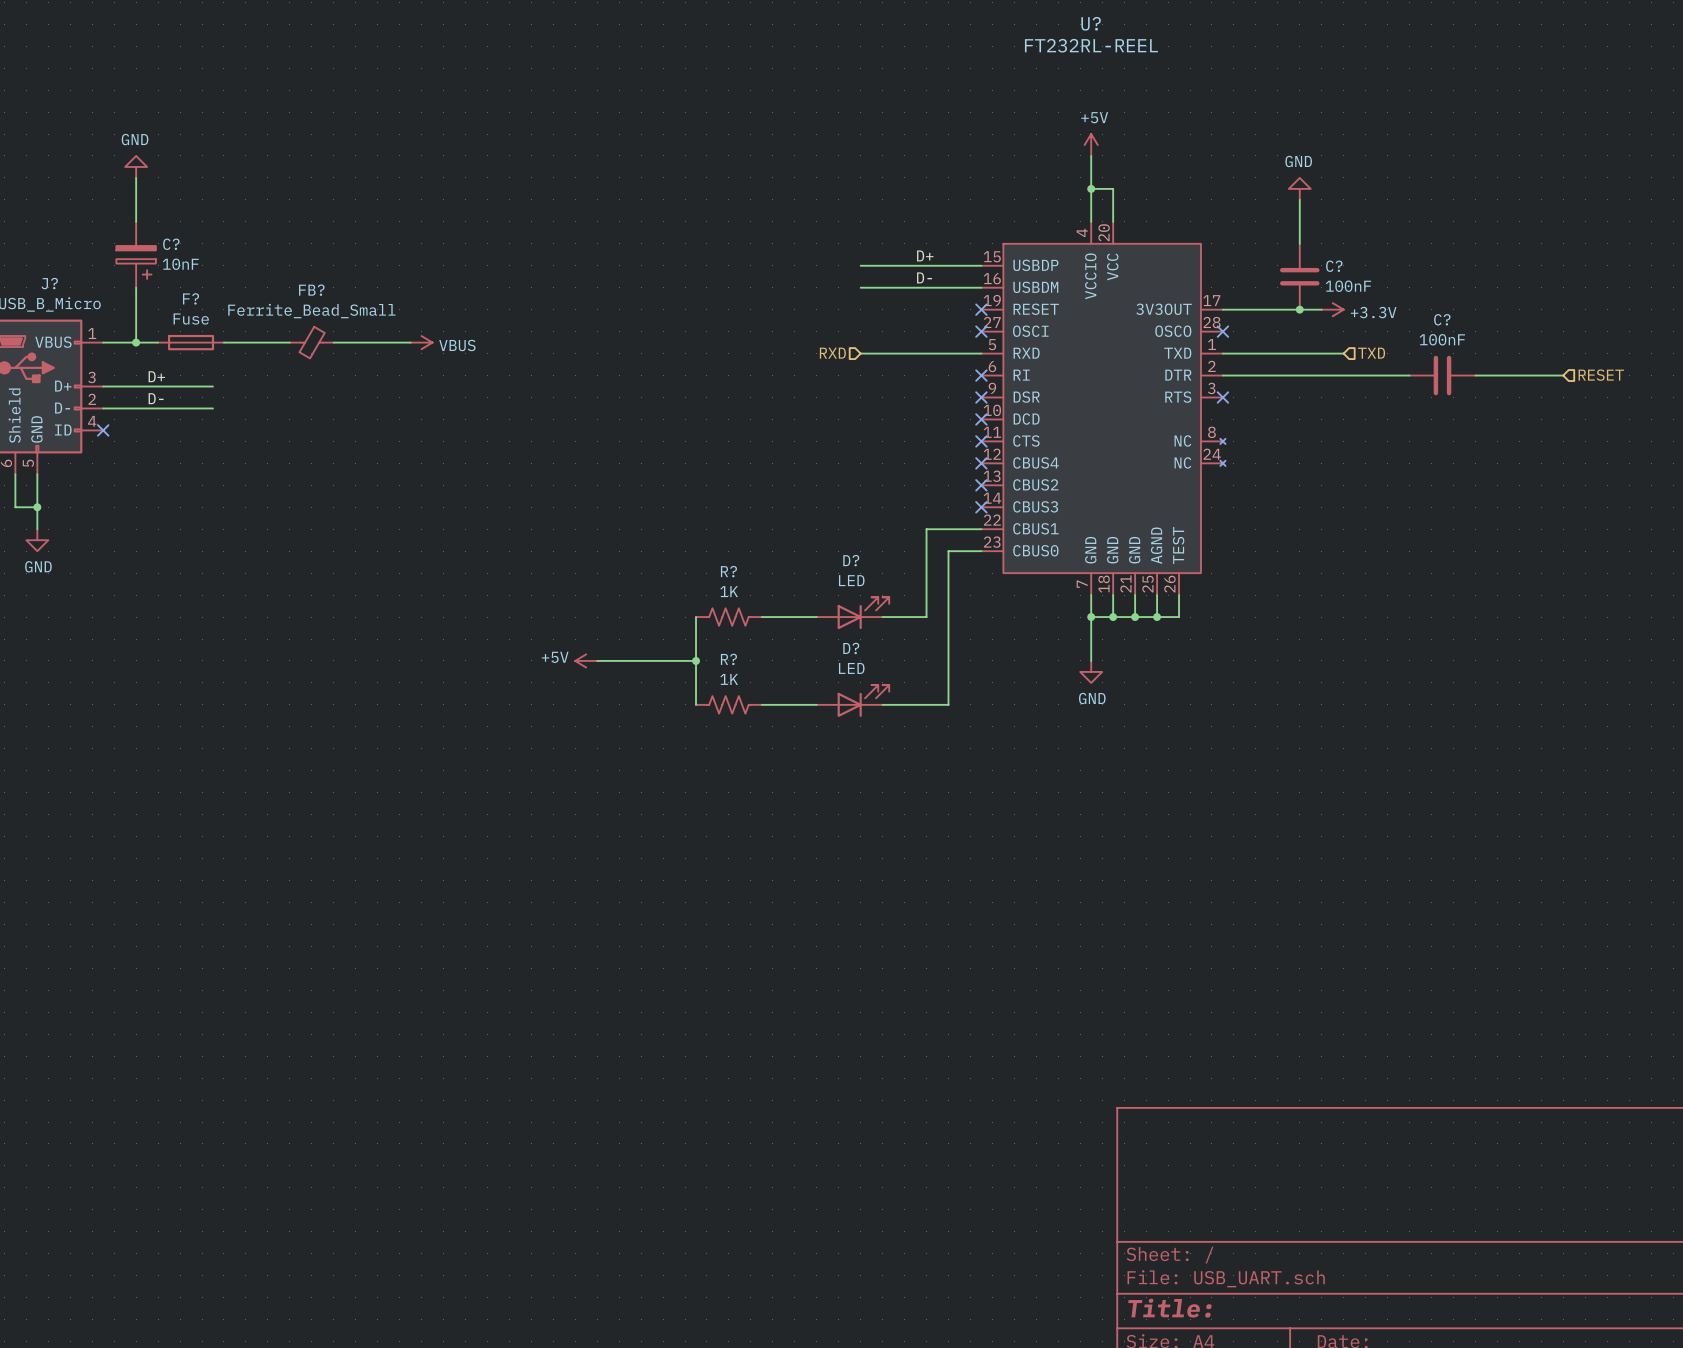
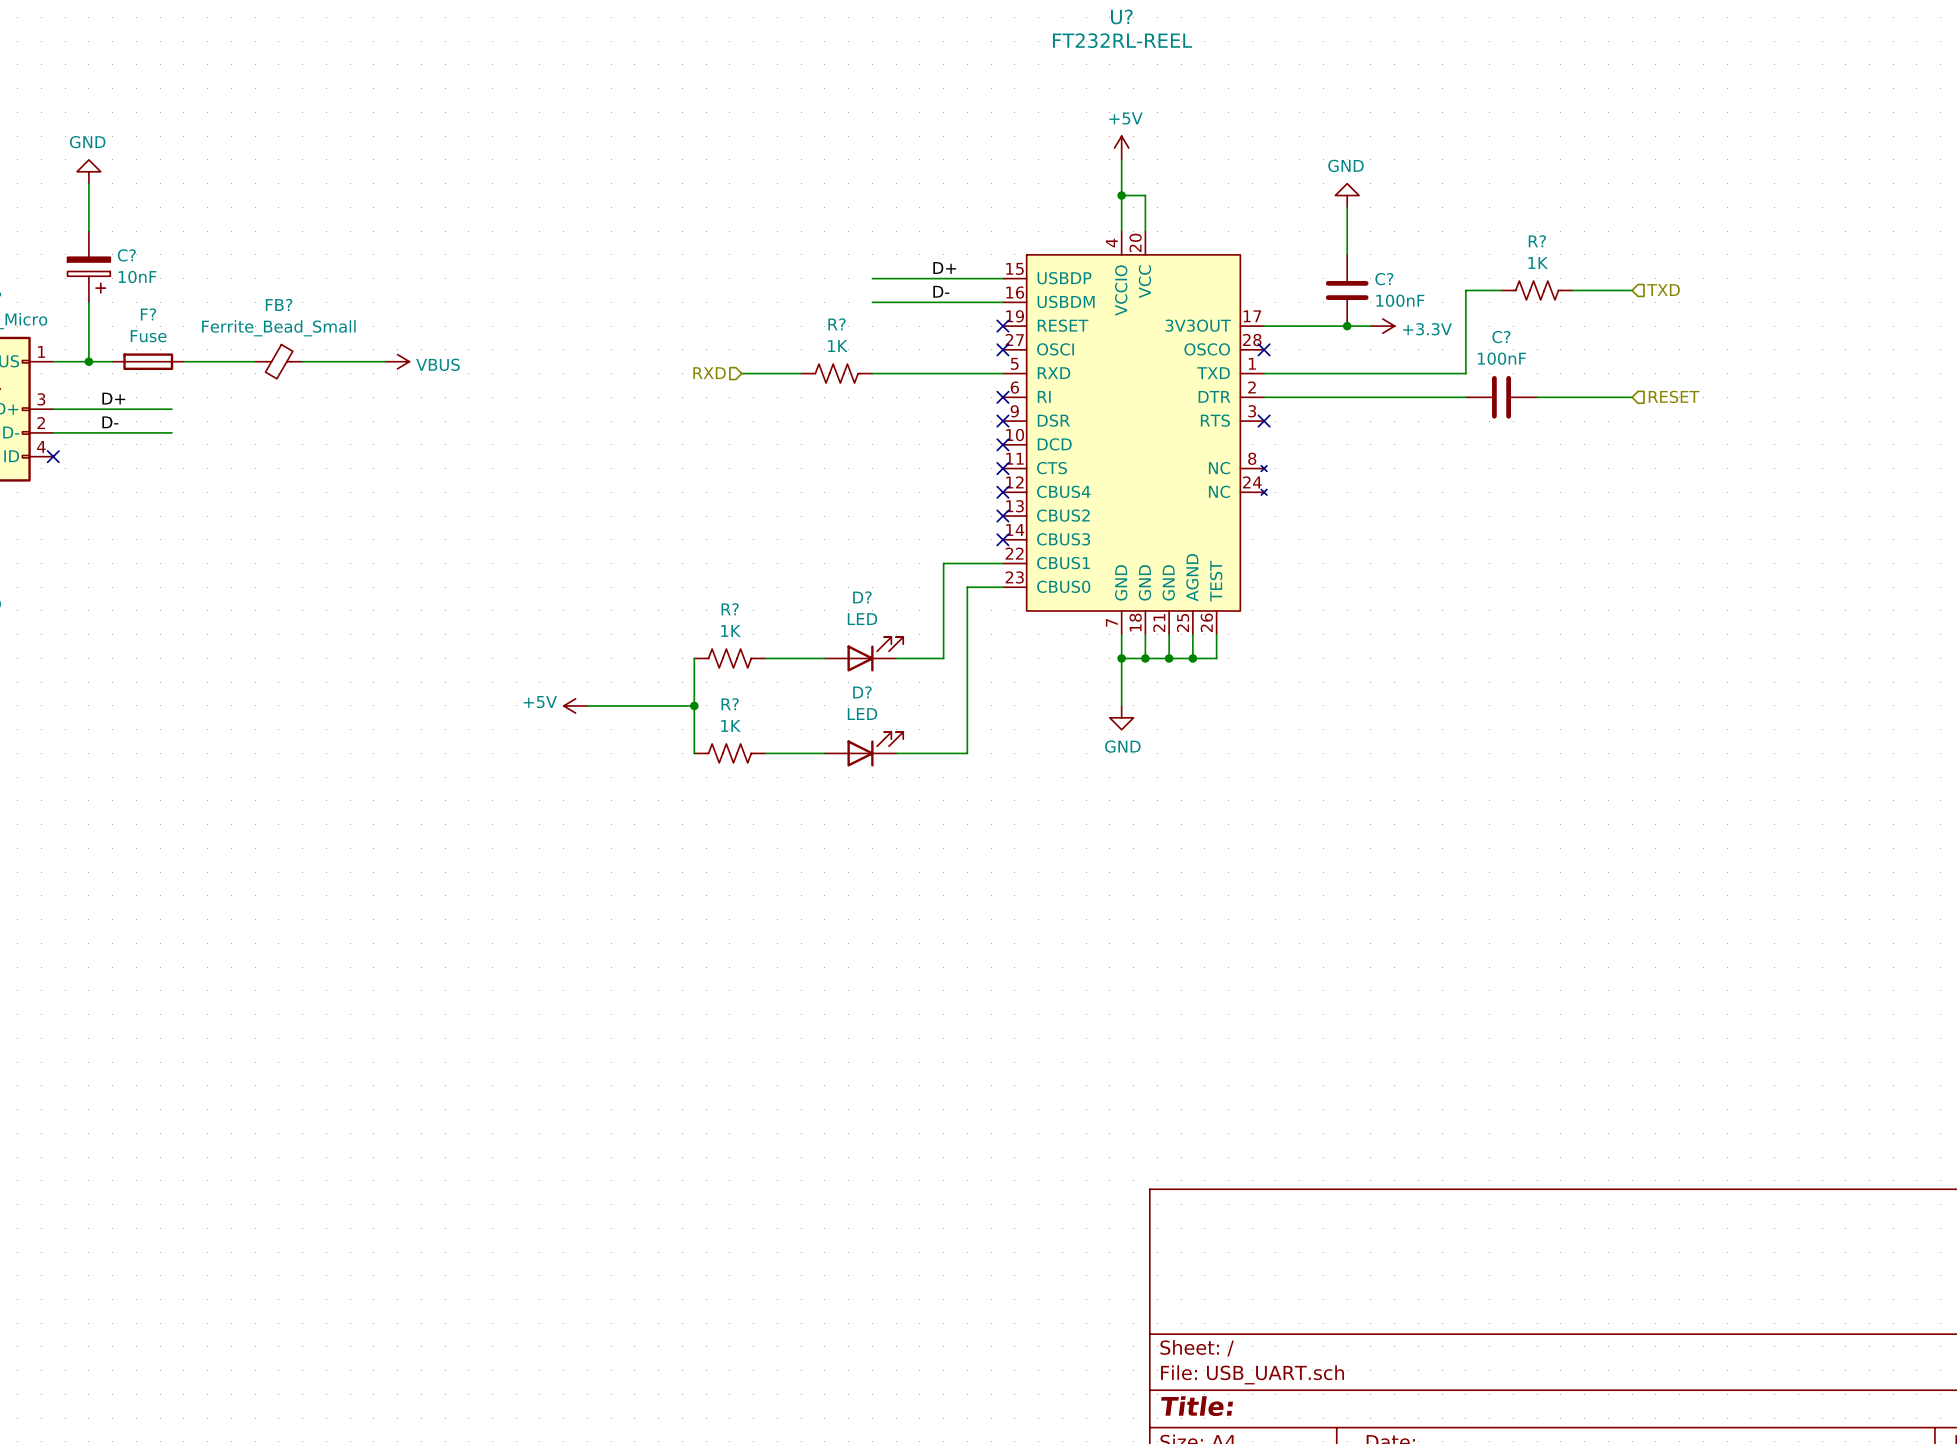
wire: none -> (1501, 290) (1465, 290) (1465, 373) (1394, 373)
R?: none -> 1K (1537, 290)
wire: none -> (1572, 290) (1632, 290)
hierarchical label: none -> TXD (1663, 290)
wire: none -> (741, 373) (801, 373)
R?: none -> 1K (836, 373)
hierarchical label position: RXD (832, 353) -> RXD (709, 373)
hierarchical label: TXD (1371, 353) -> none

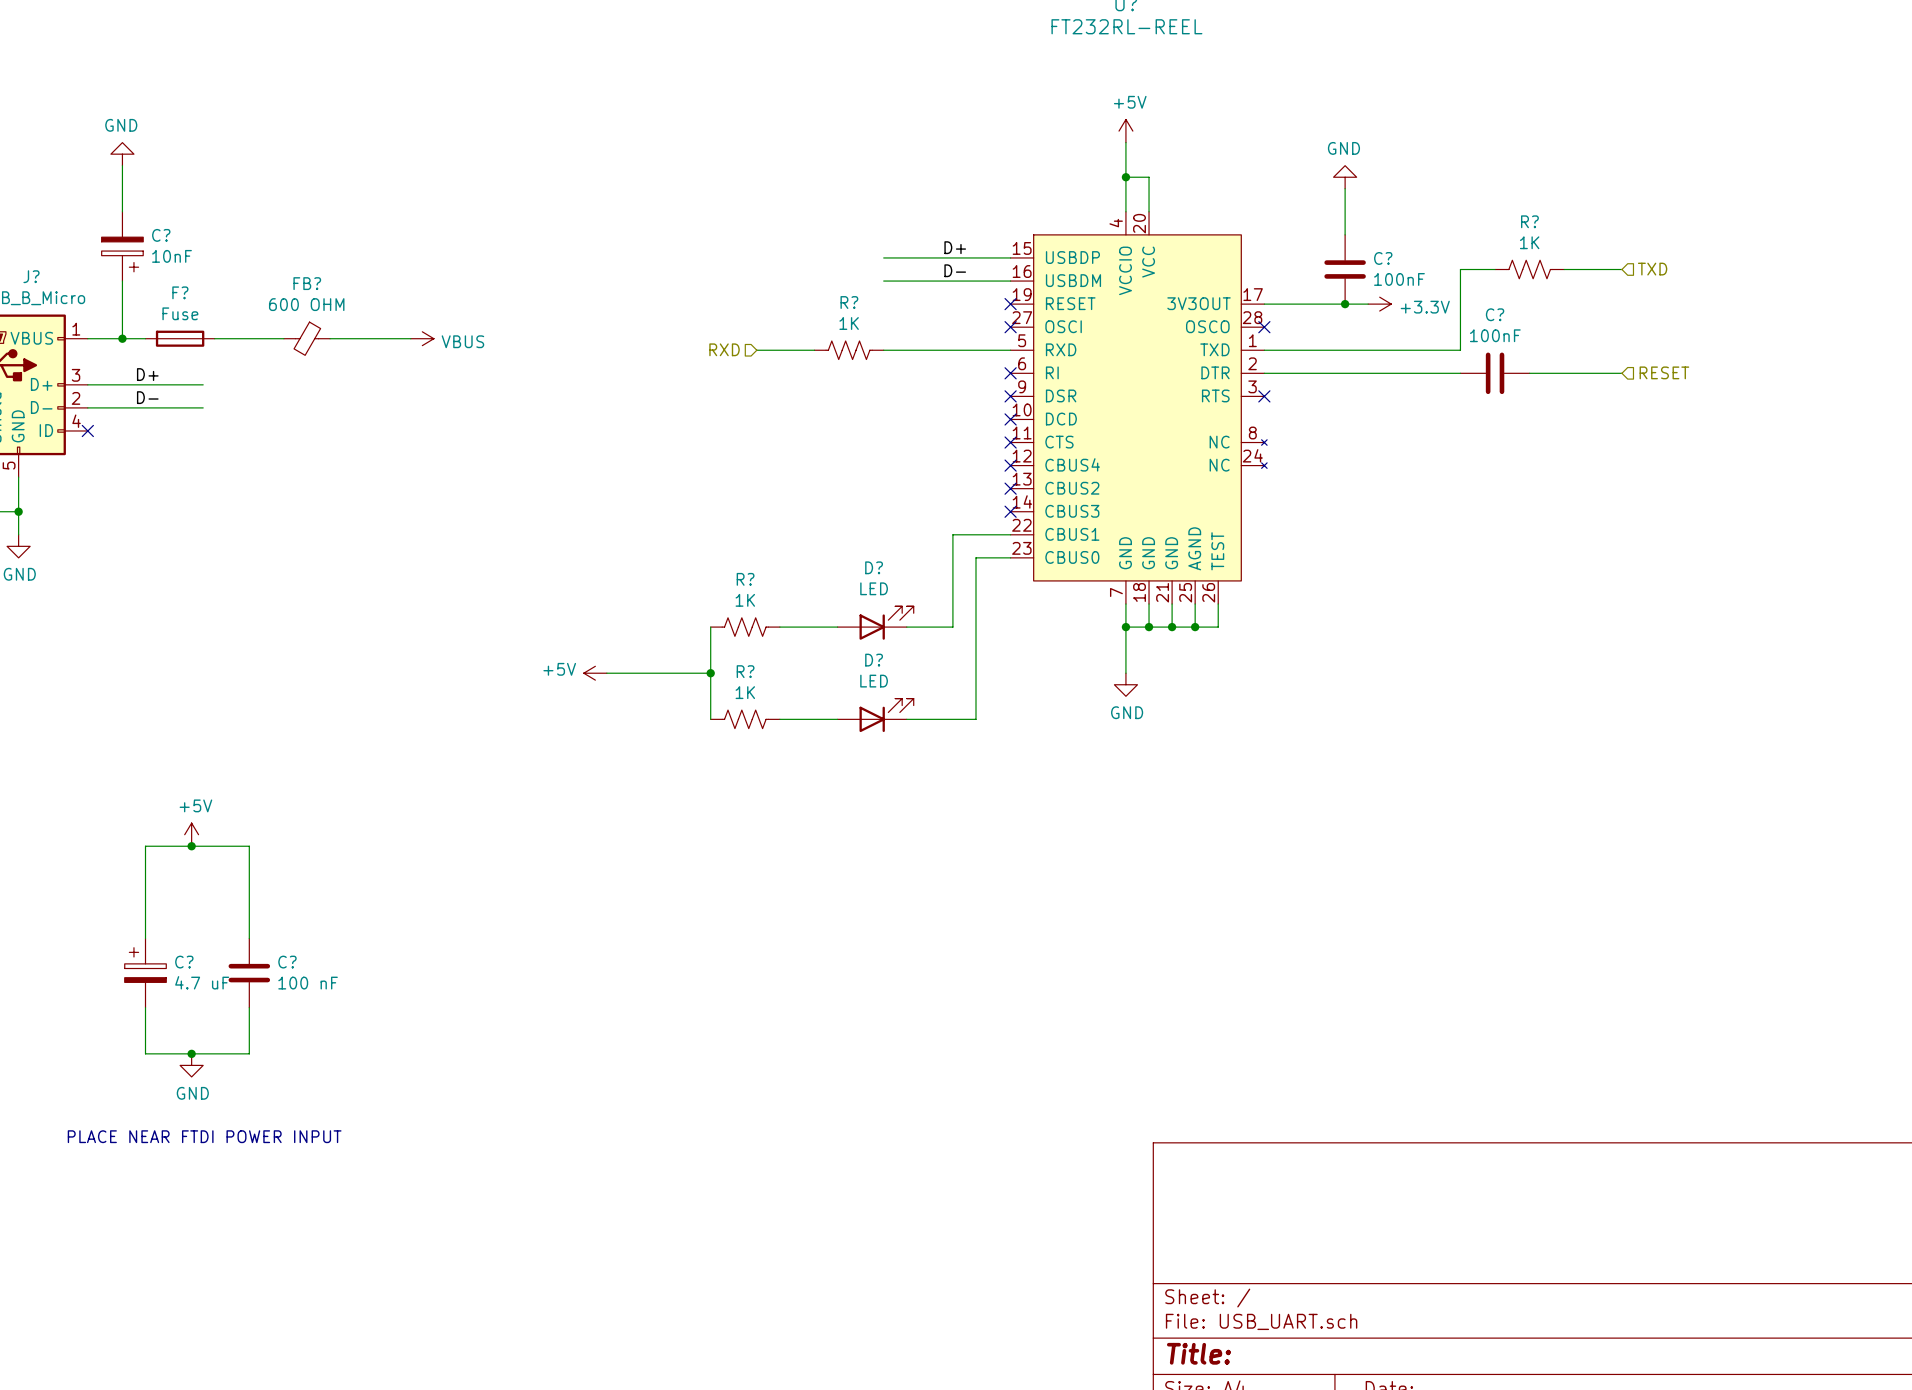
FB? value: Ferrite_Bead_Small (278, 328) -> 600 OHM (306, 304)
power symbol: none -> +5V (191, 834)
junction: none -> (191, 846)
wire: none -> (145, 938) (145, 846) (249, 846) (249, 938)
C?: none -> 4.7 uF (145, 973)
C?: none -> 100 nF (249, 973)
wire: none -> (145, 1007) (145, 1053) (249, 1053) (249, 1007)
junction: none -> (191, 1053)
power symbol: none -> GND (191, 1065)
text: none -> PLACE NEAR FTDI POWER INPUT (204, 1136)

